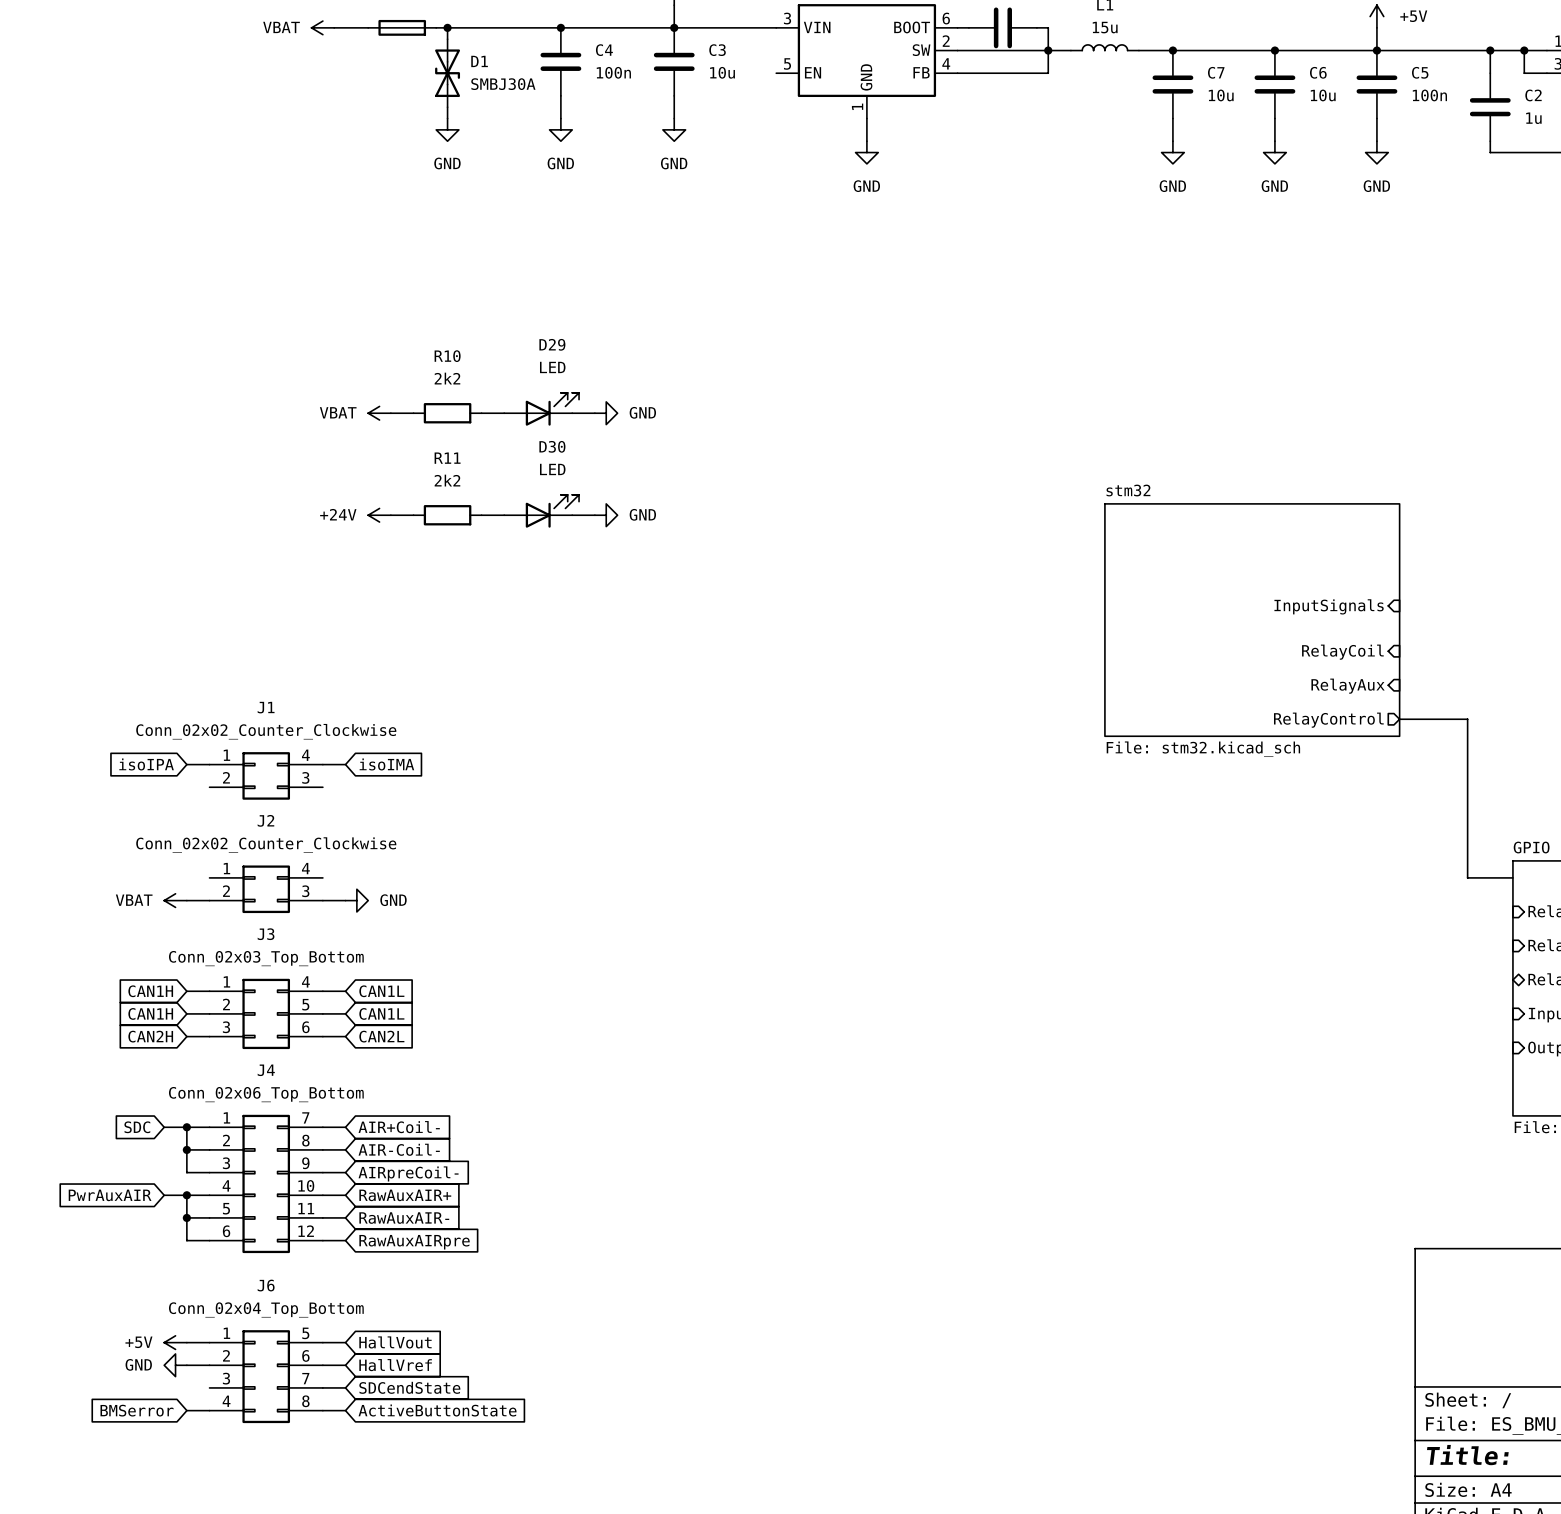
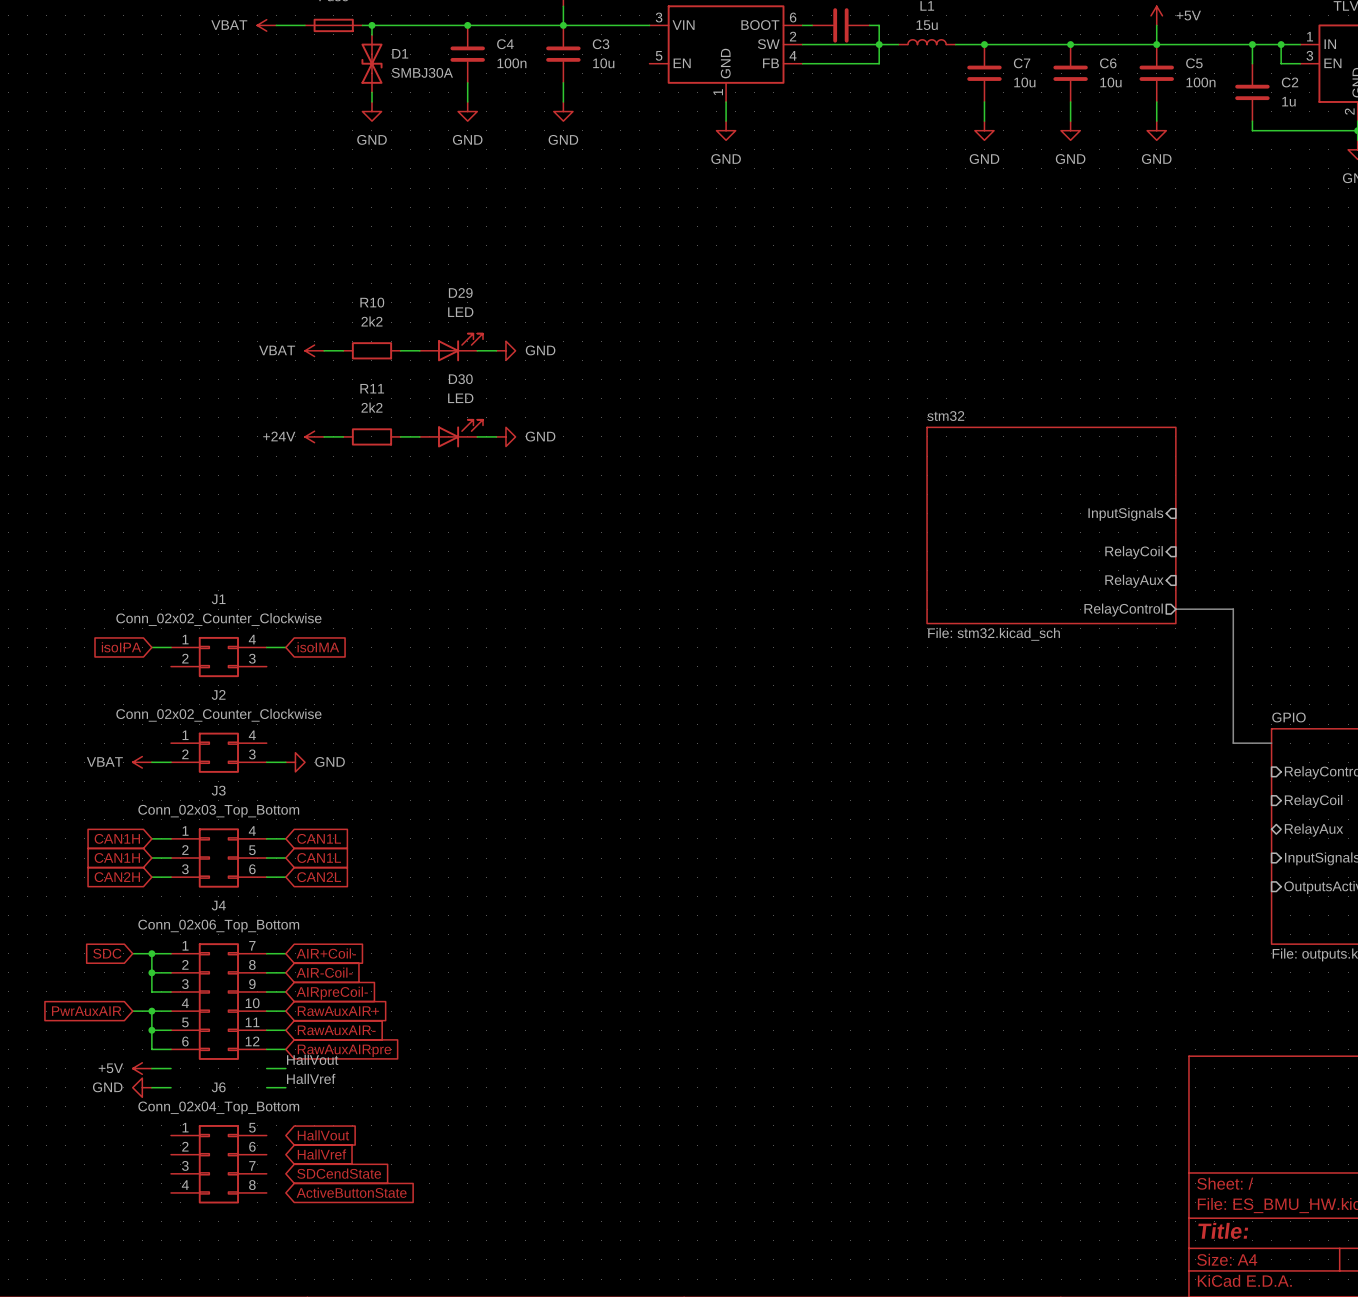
label: none -> HallVout (312, 1059)
label: none -> HallVref (311, 1078)
power symbol position: +5V (175, 1342) -> +5V (142, 1068)
wire: (186, 1342) (209, 1342) -> (151, 1068) (171, 1068)
wire: (322, 1342) (345, 1342) -> (266, 1068) (285, 1068)
power symbol position: GND (175, 1365) -> GND (142, 1087)
wire: (186, 1365) (209, 1365) -> (151, 1087) (171, 1087)
wire: (322, 1365) (345, 1365) -> (266, 1087) (285, 1087)
wire: (322, 1387) (345, 1387) -> none
global label: BMSerror (137, 1410) -> none
wire: (186, 1410) (209, 1410) -> none
wire: (322, 1410) (345, 1410) -> none

